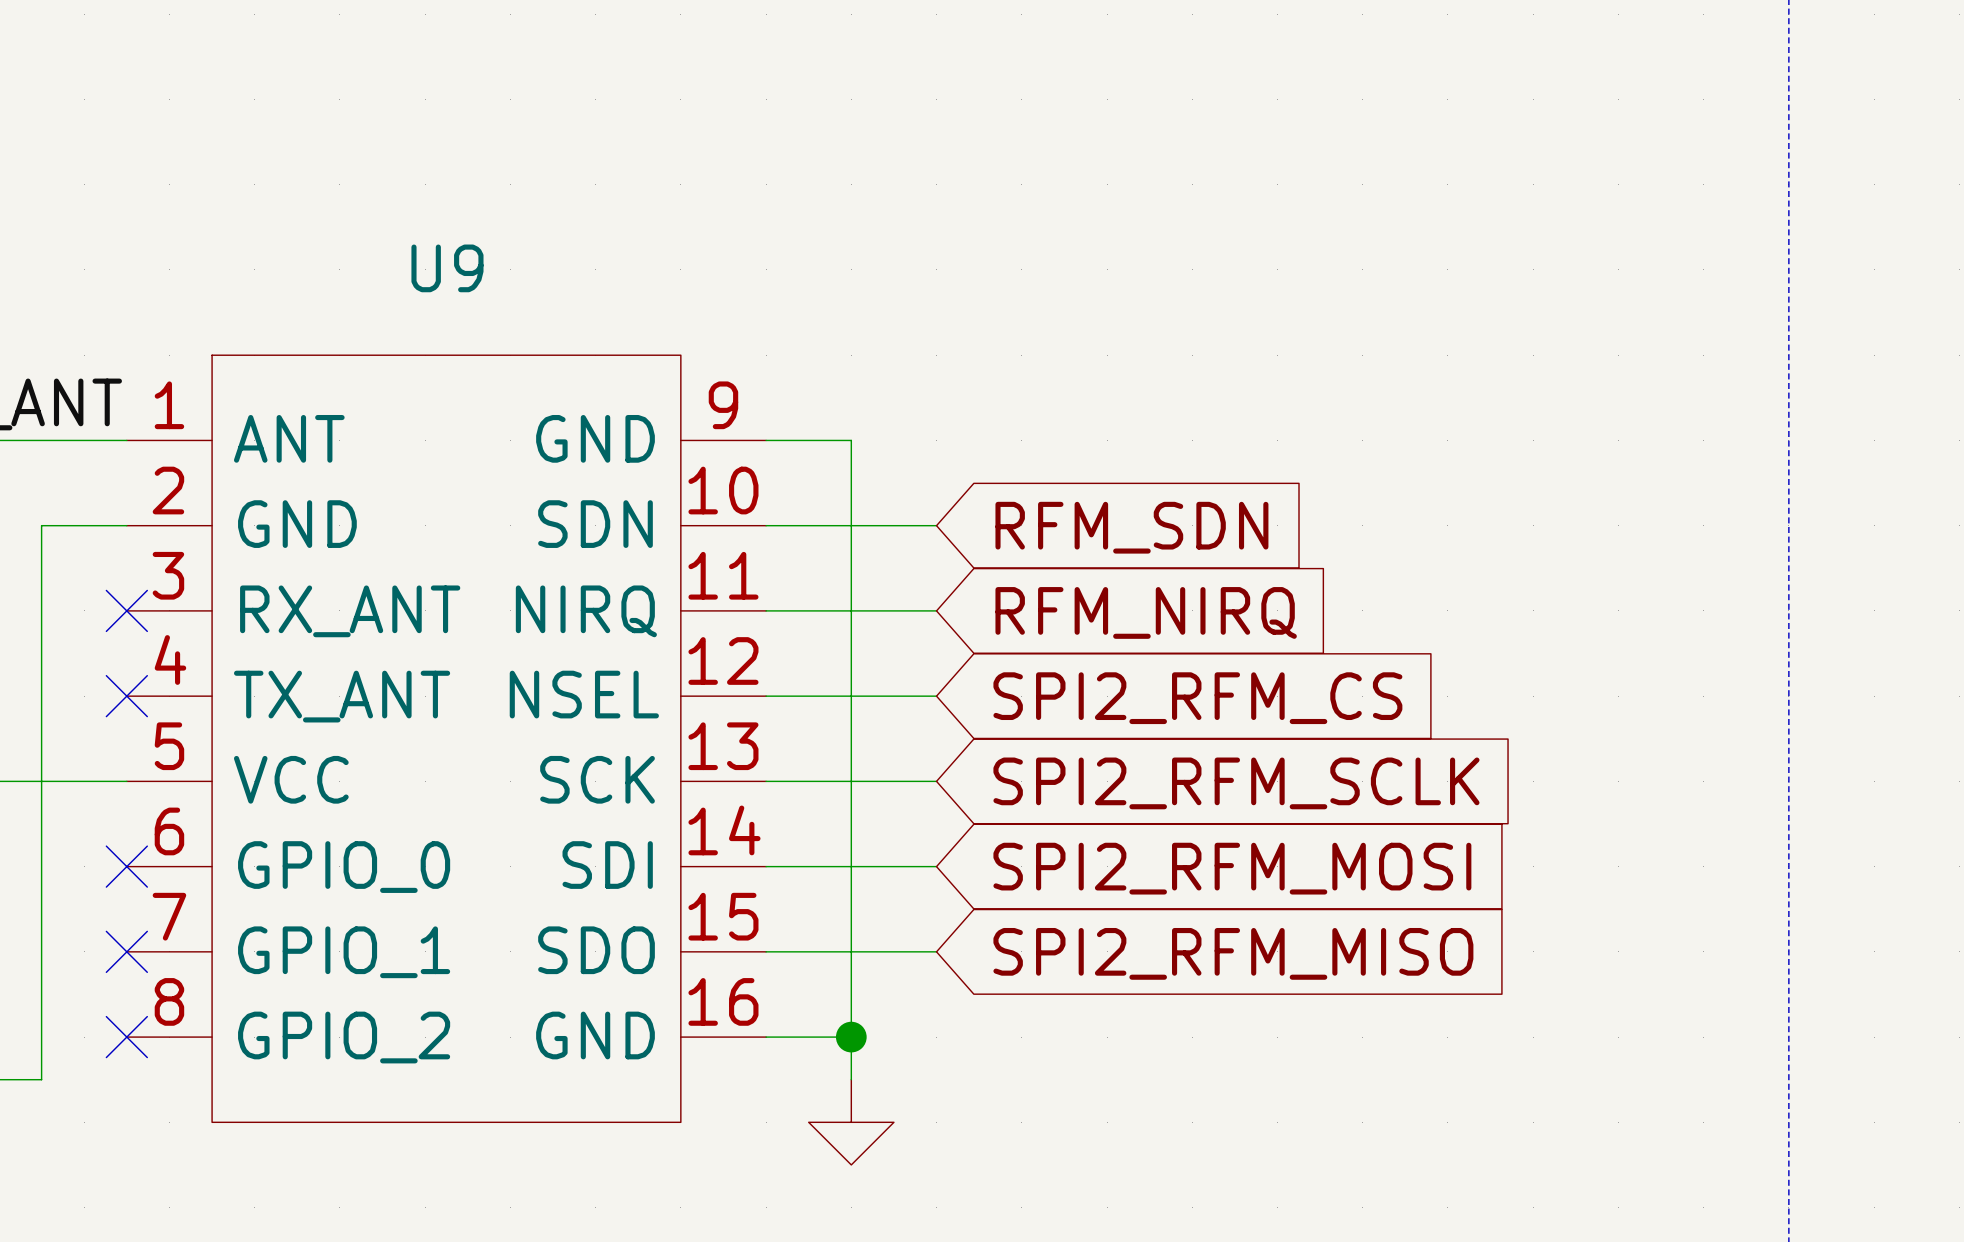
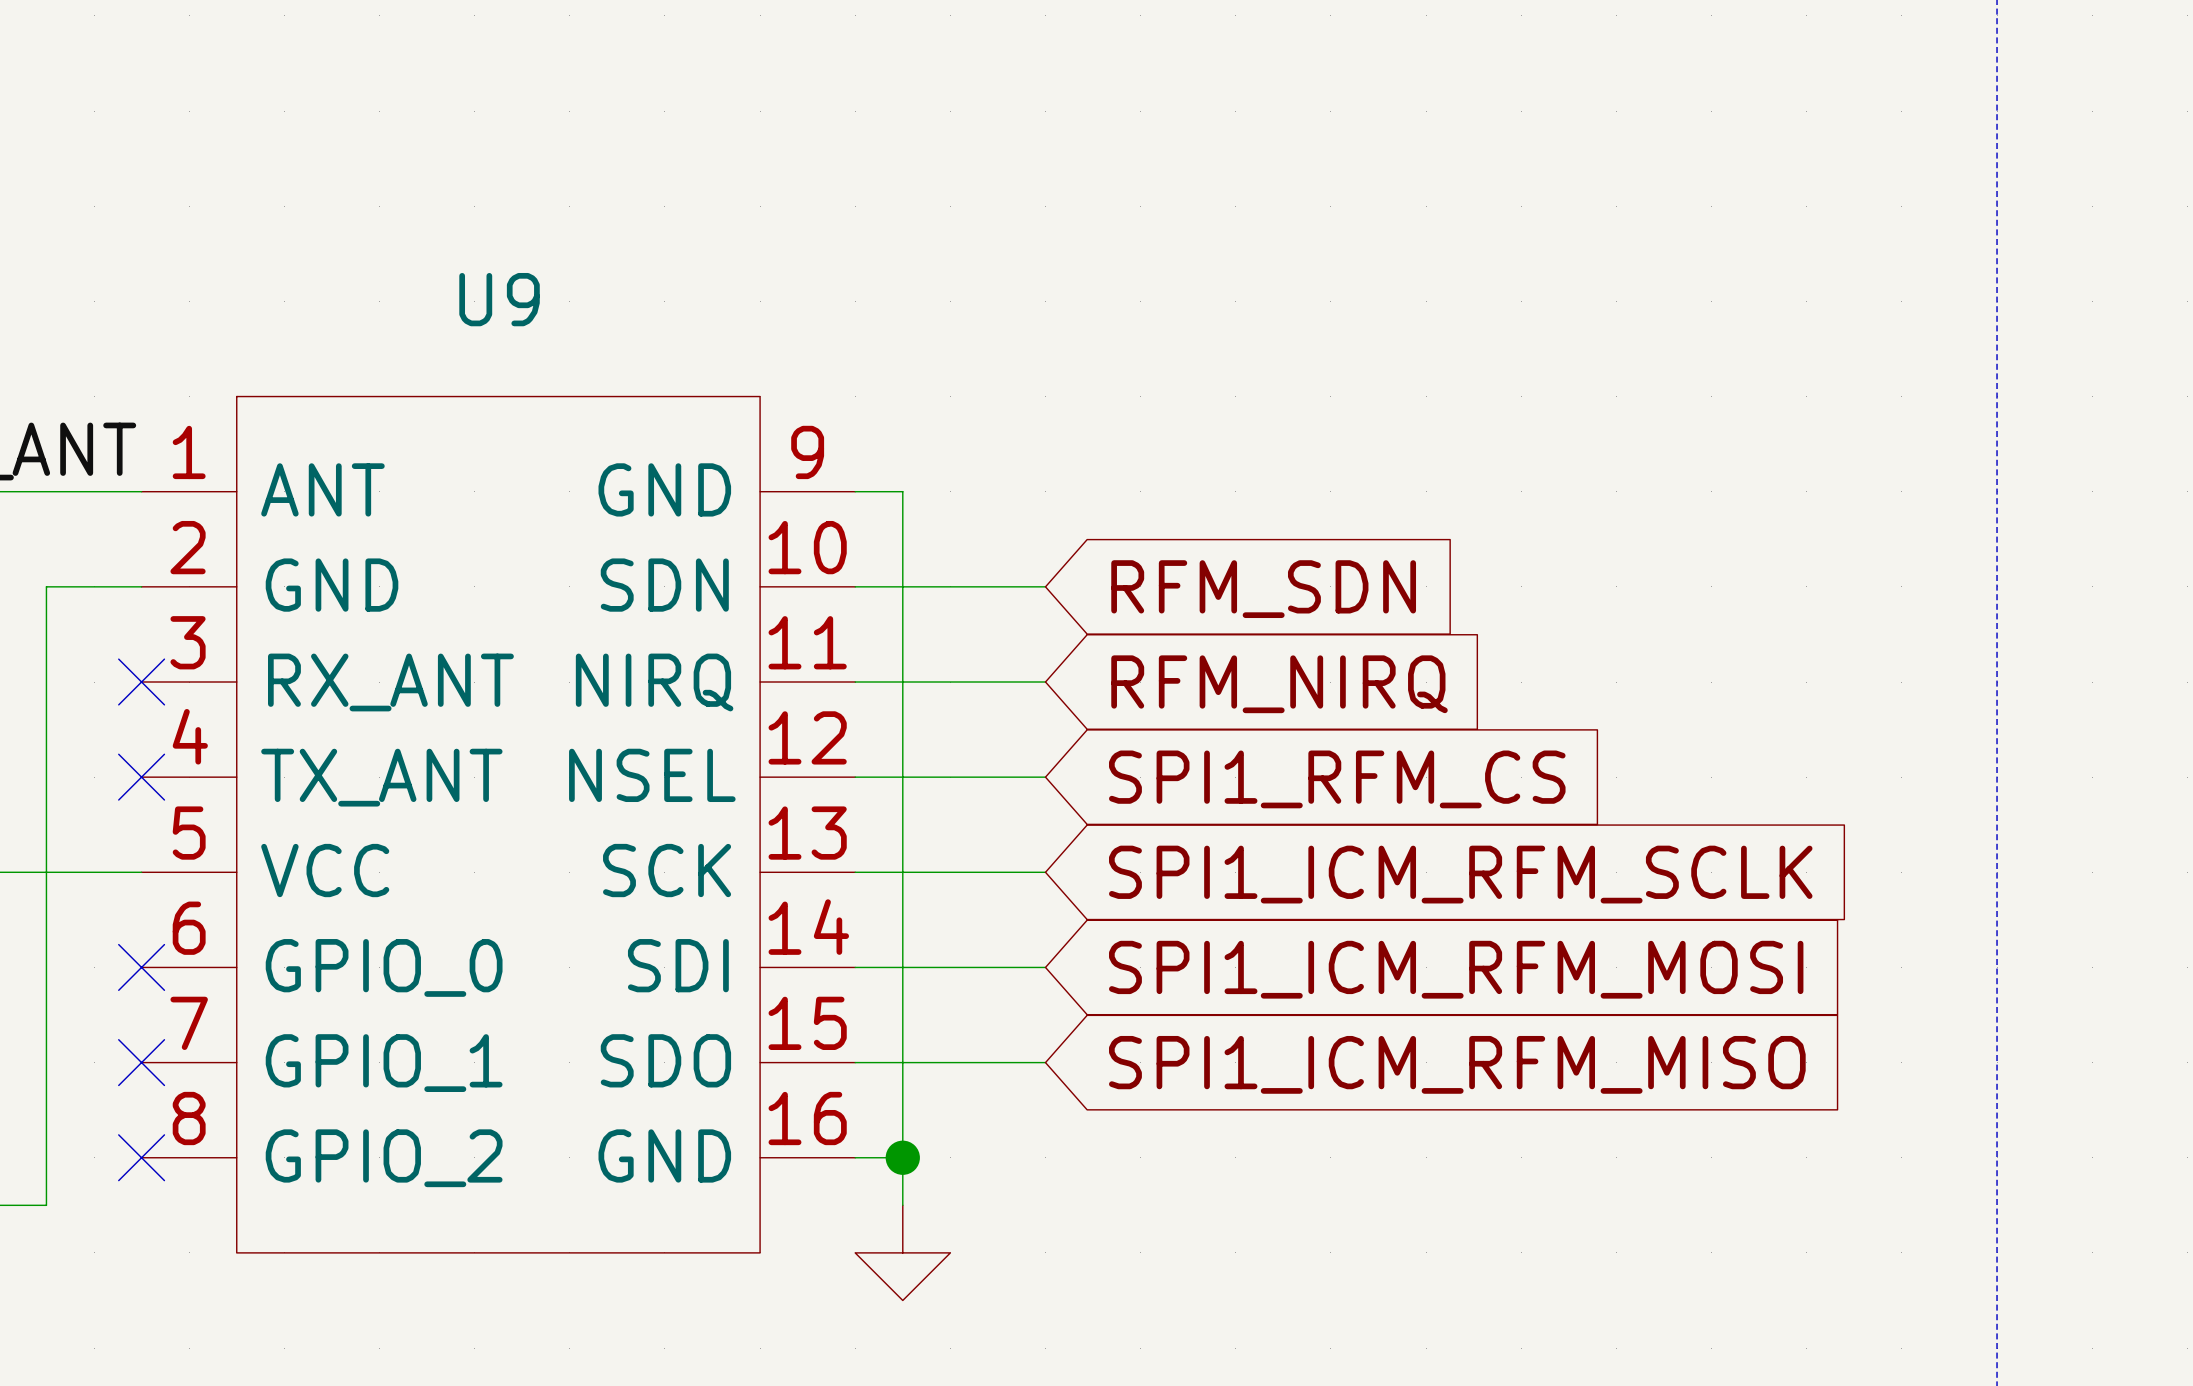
wire: (808, 440) (851, 440) (851, 1079) -> (902, 491) (902, 1205)
global label: SPI2_RFM_CS (1197, 698) -> SPI1_RFM_CS (1337, 779)
global label: SPI2_RFM_SCLK (1236, 783) -> SPI1_ICM_RFM_SCLK (1460, 874)
global label: SPI2_RFM_MOSI (1232, 868) -> SPI1_ICM_RFM_MOSI (1456, 969)
global label: SPI2_RFM_MISO (1233, 953) -> SPI1_ICM_RFM_MISO (1457, 1064)
wire: (808, 1037) (851, 1037) -> none
junction position: (851, 1037) -> (902, 1157)
power symbol position: (851, 1122) -> (902, 1252)

